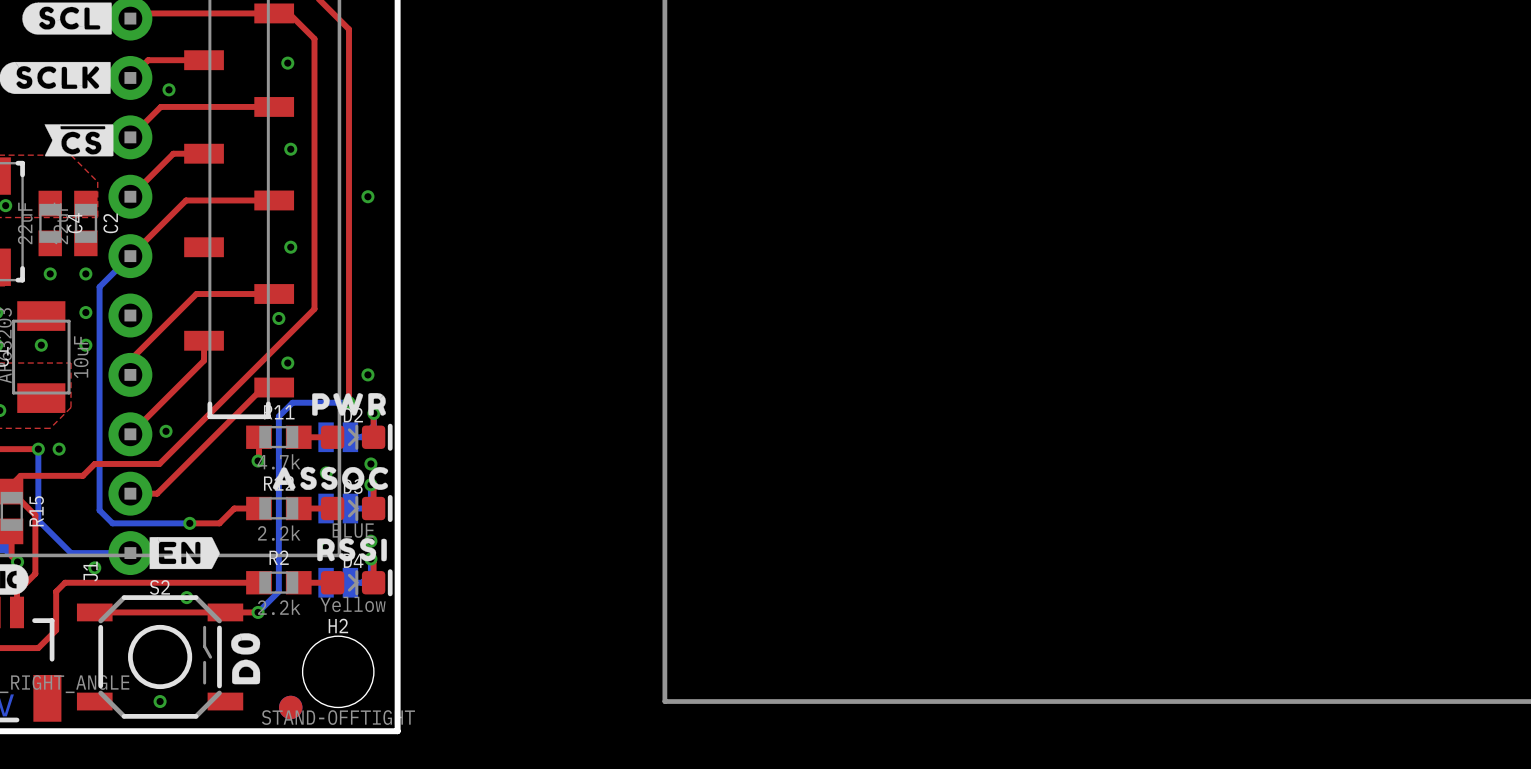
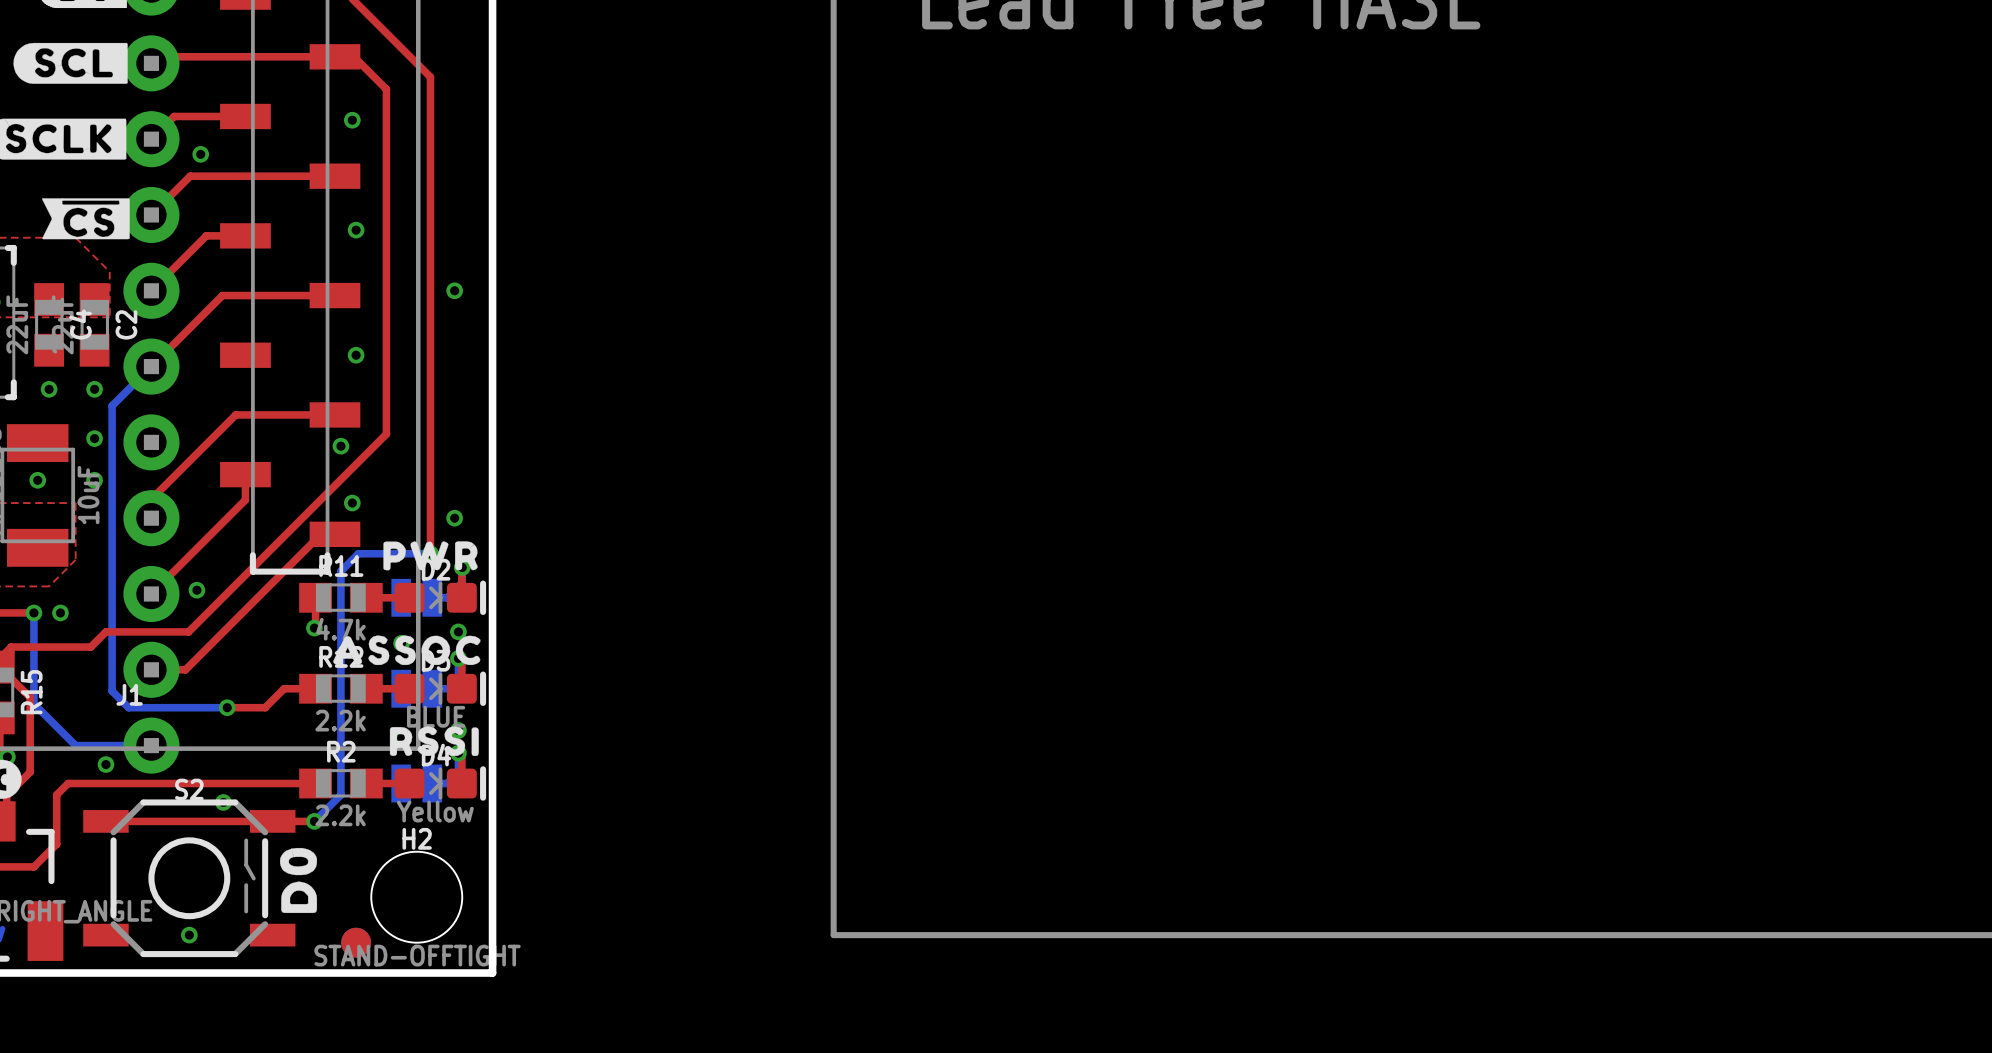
drawing: [149, 537, 220, 570] -> none
J1 name rotation: 0° (90, 571) -> 90° clockwise (129, 694)
J1 name position: J1 (90, 571) -> J1 (129, 694)

